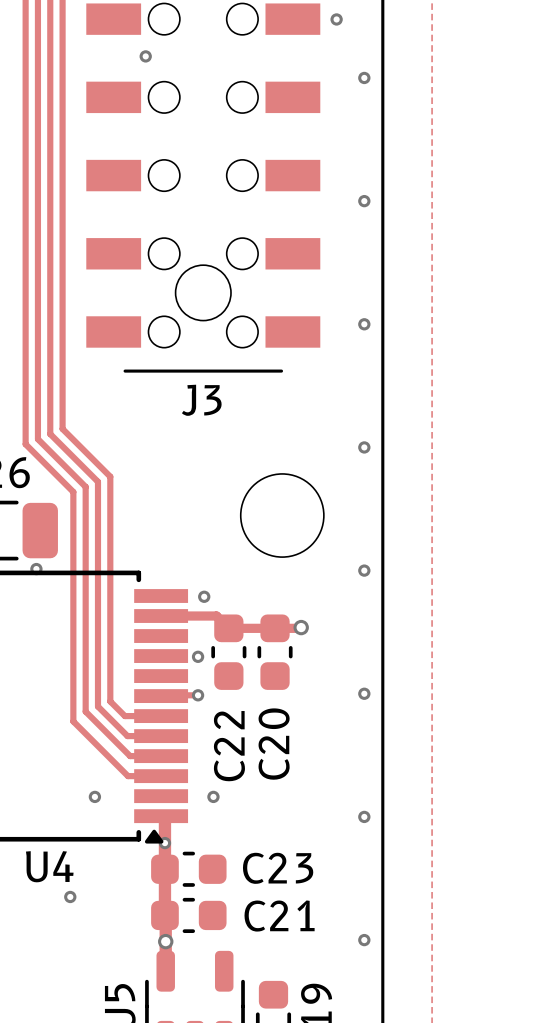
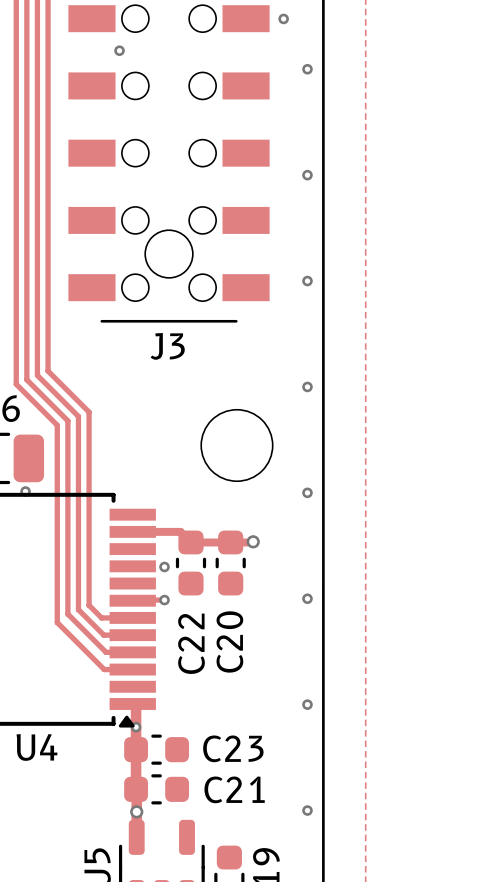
via: (204, 596) -> none
via: (94, 796) -> none
via: (213, 796) -> none
via: (70, 896) -> none

